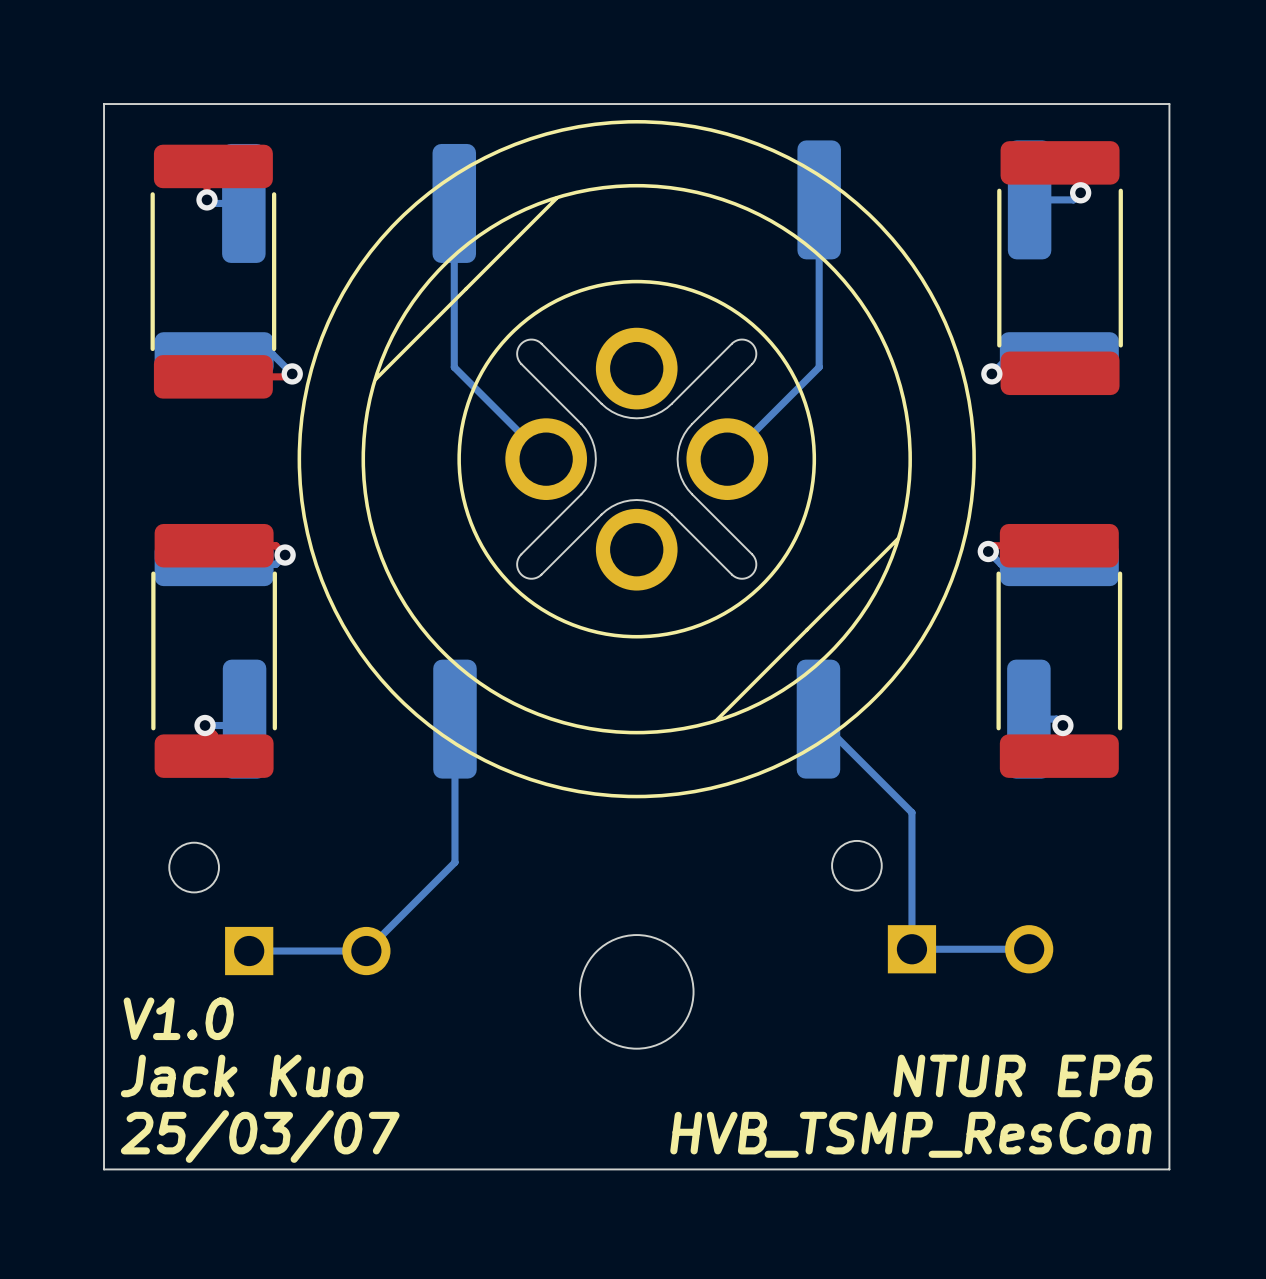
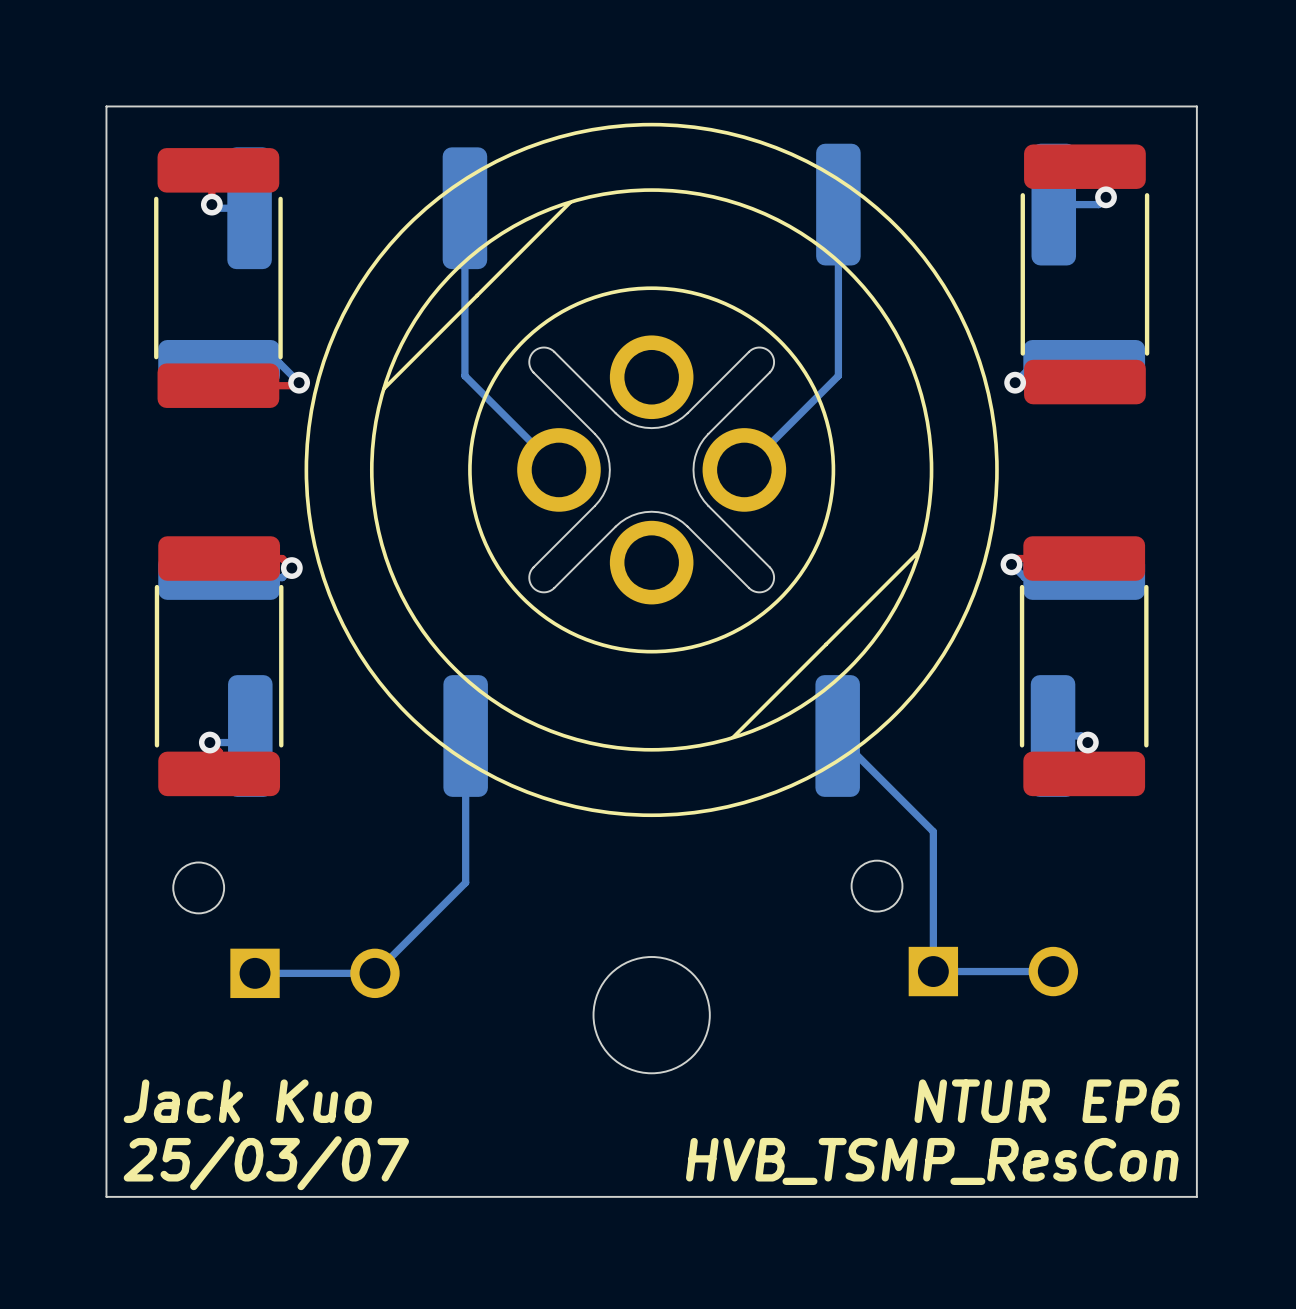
text: V1.0 (178, 1018) -> none

